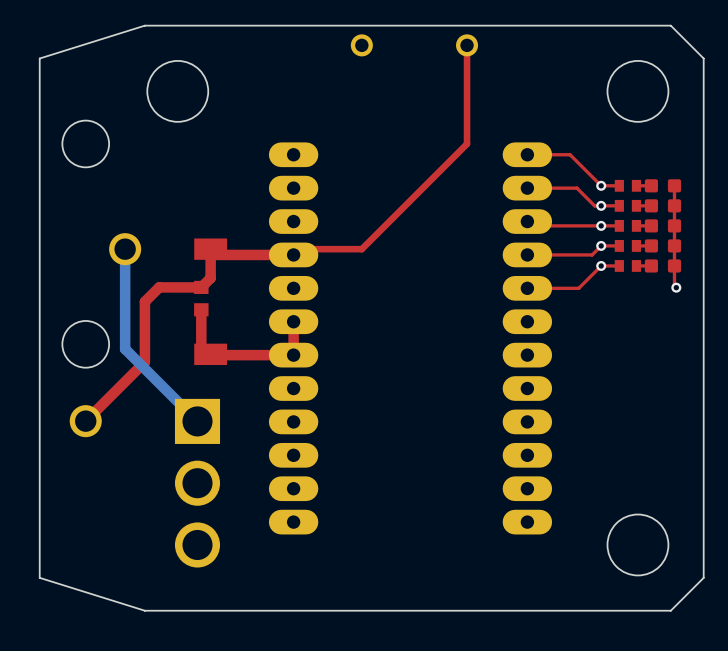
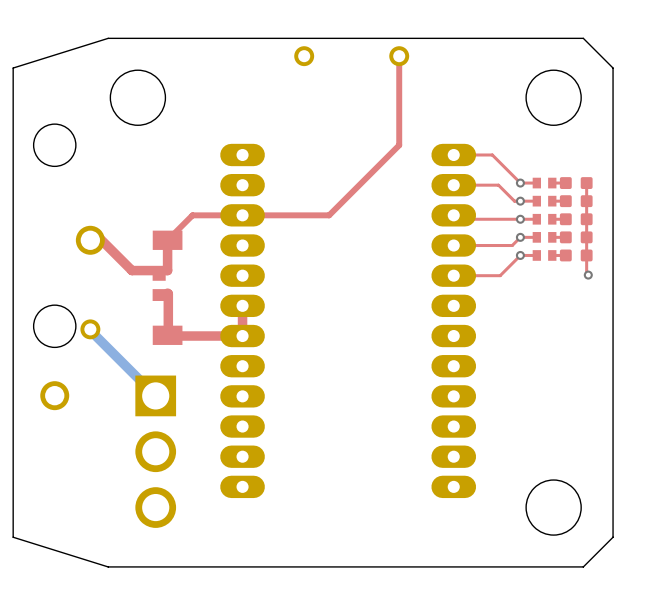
top track: (389, 221) (361, 249) (299, 249) (293, 254) (216, 254) (210, 249) -> (329, 215) (192, 215) (167, 240)
bottom track: (125, 249) (125, 347) -> none
top track: (210, 278) (201, 287) (159, 287) (144, 301) (144, 361) (85, 421) -> (167, 266) (167, 270) (131, 270) (95, 234) (90, 234)
top track: none -> (167, 293) (168, 336)
top track: (201, 309) (201, 345) (210, 354) -> none
part: none -> (90, 329)

